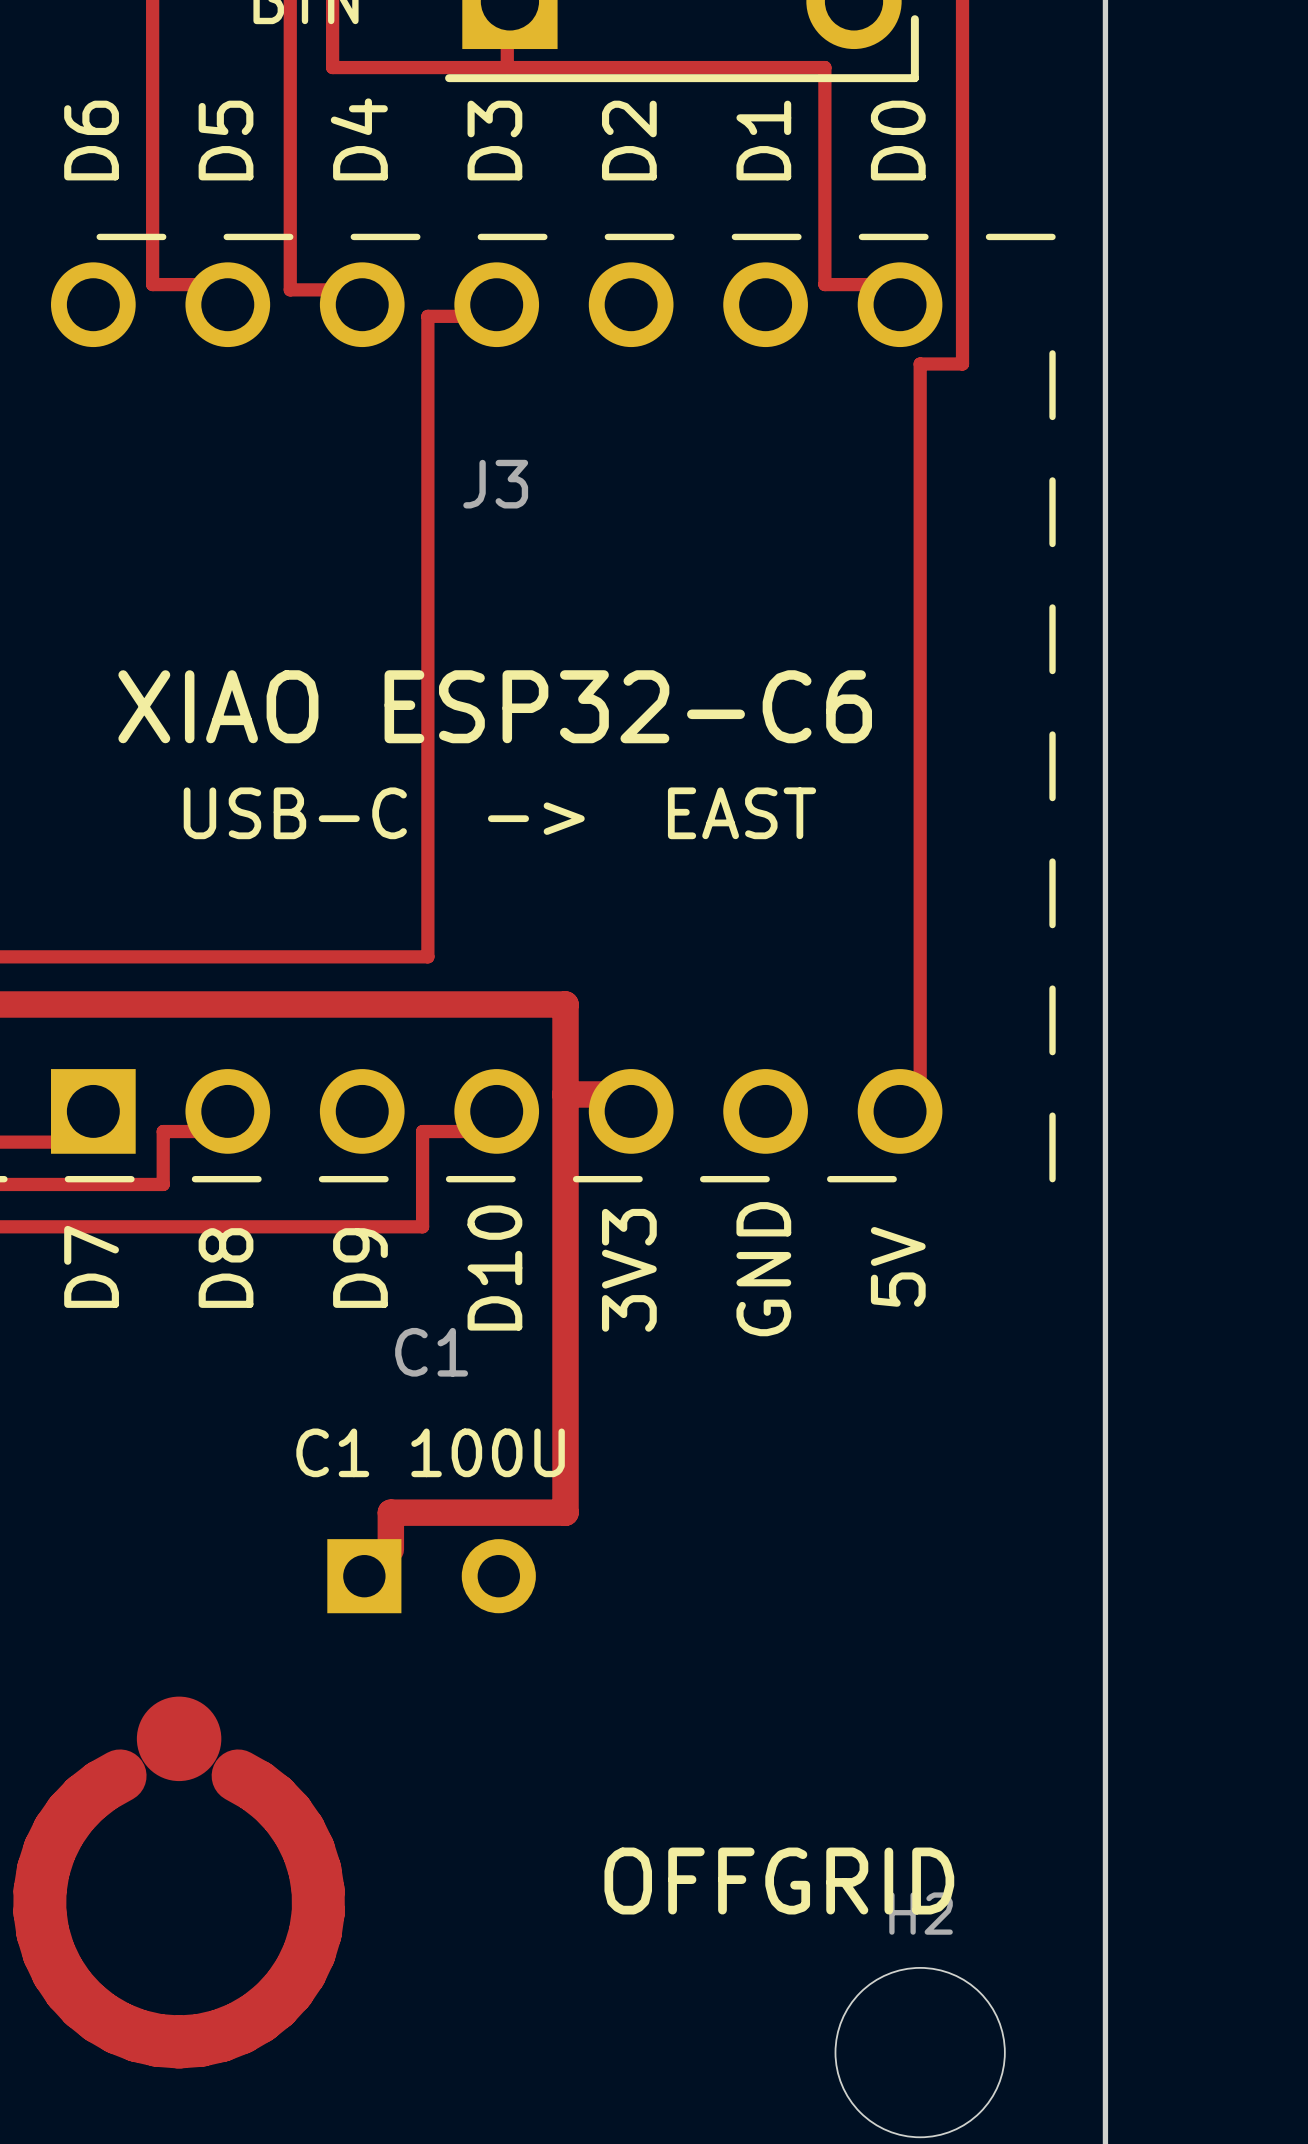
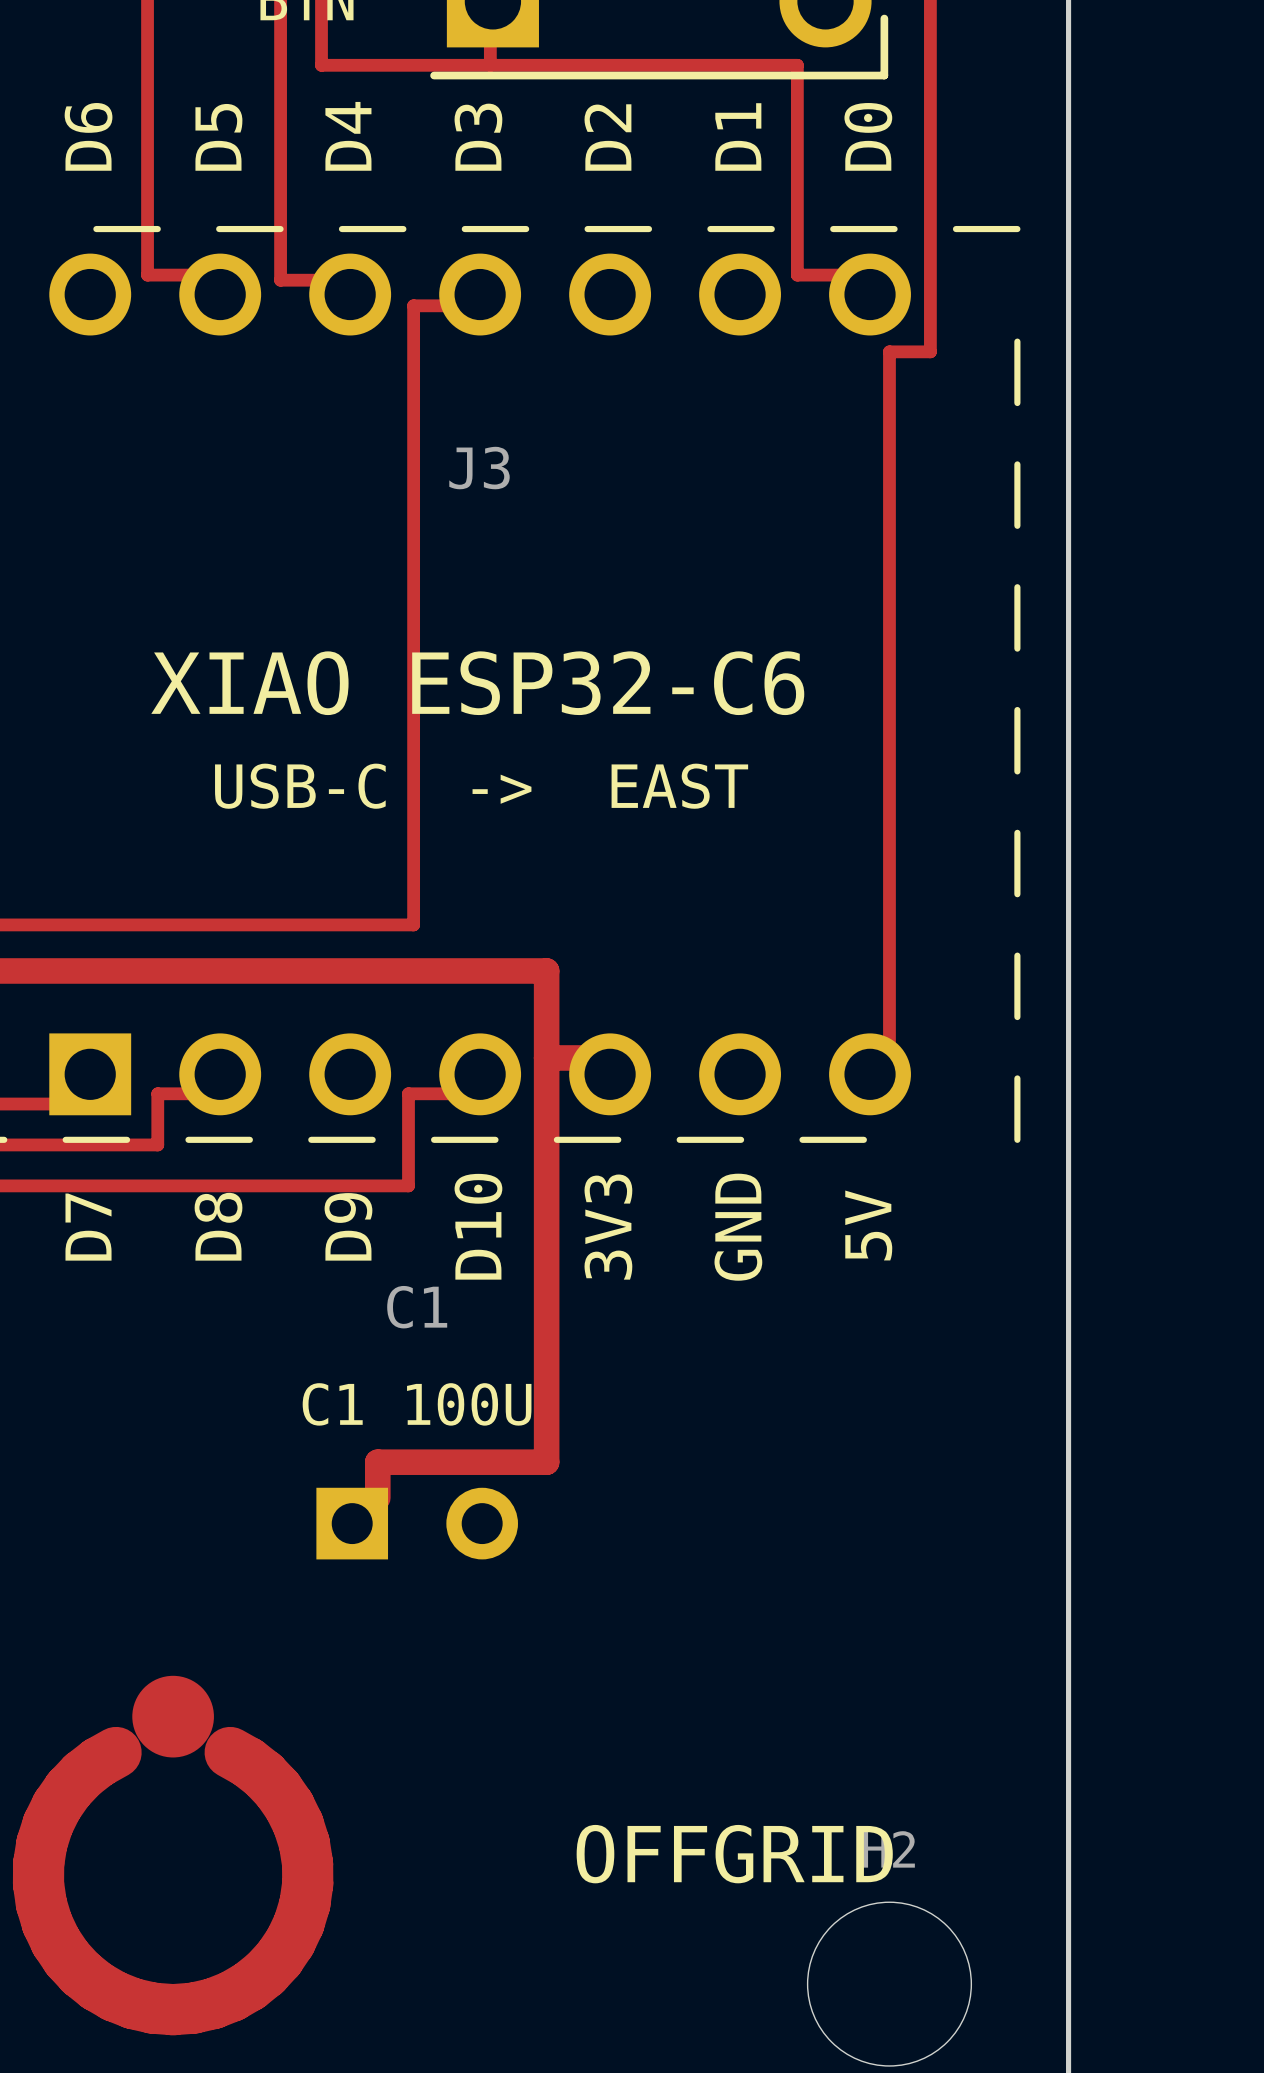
drawing position: (179, 1738) -> (173, 1716)
track: (120, 1775) (101, 1786) (85, 1799) (70, 1814) (58, 1831) (49, 1850) (43, 1870) (39, 1890) (39, 1911) (42, 1932) (48, 1952) (57, 1971) (69, 1988) (83, 2004) (100, 2017) (118, 2028) (137, 2035) (158, 2040) (179, 2041) (199, 2040) (220, 2035) (239, 2028) (258, 2017) (274, 2004) (288, 1988) (300, 1971) (309, 1952) (315, 1932) (318, 1911) (318, 1890) (314, 1870) (308, 1850) (299, 1831) (287, 1814) (272, 1799) (256, 1786) (238, 1775) -> (116, 1752) (98, 1762) (82, 1774) (68, 1789) (56, 1806) (47, 1824) (41, 1843) (38, 1863) (38, 1883) (41, 1903) (47, 1923) (55, 1941) (67, 1958) (81, 1973) (96, 1986) (114, 1996) (133, 2003) (152, 2008) (173, 2009) (193, 2008) (213, 2003) (231, 1996) (249, 1986) (265, 1973) (278, 1958) (290, 1941) (298, 1923) (304, 1903) (307, 1883) (307, 1863) (304, 1843) (298, 1824) (289, 1806) (277, 1789) (263, 1774) (247, 1762) (230, 1752)
text position: OFFGRID (779, 1881) -> OFFGRID (734, 1854)

